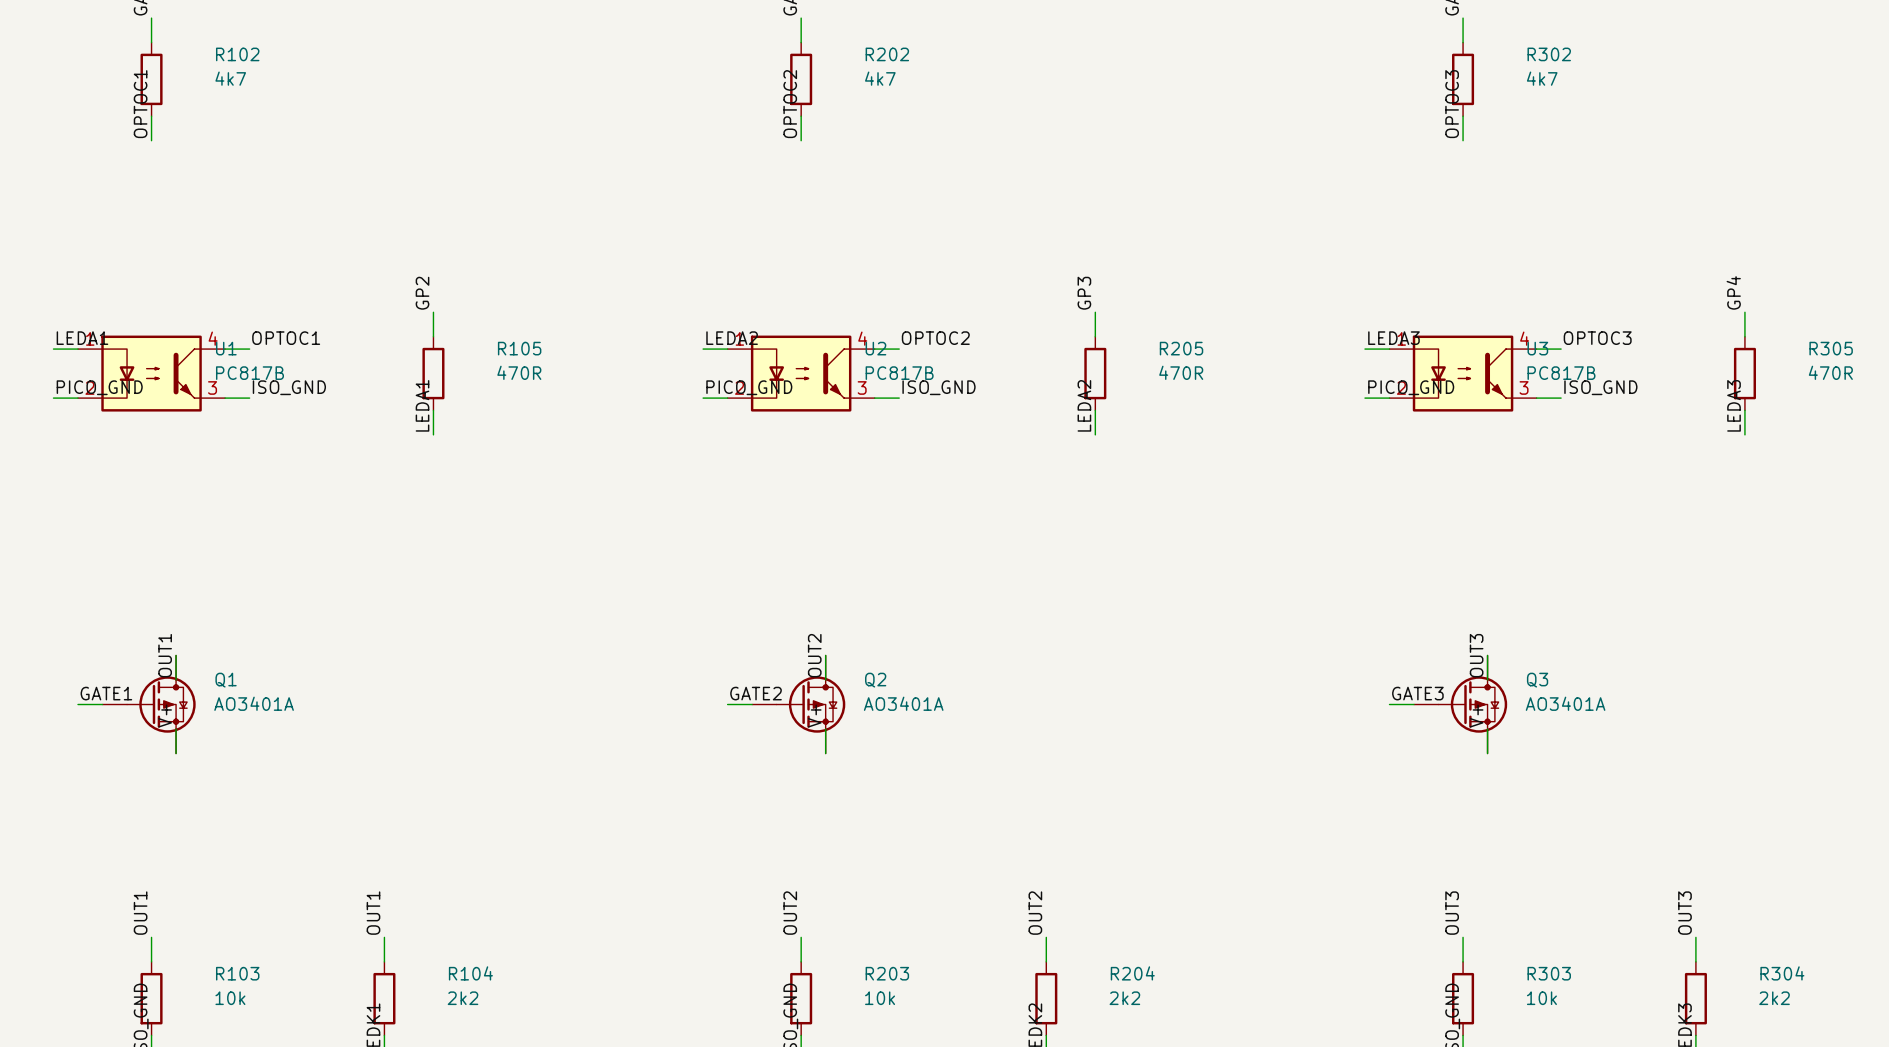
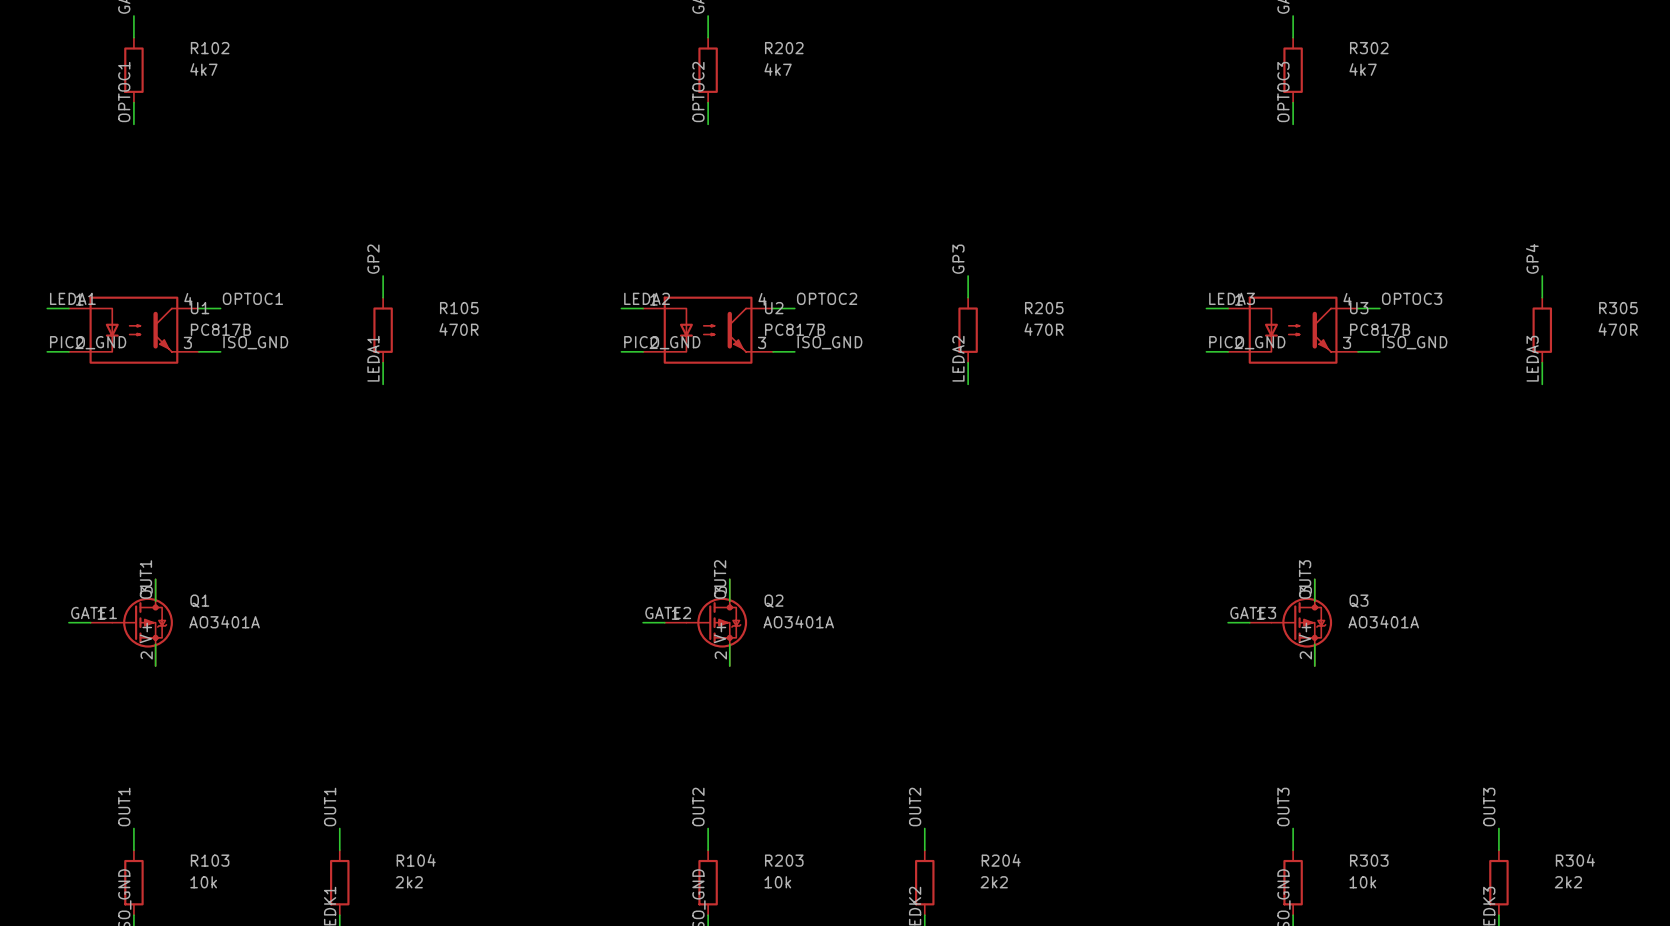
Q1 symbol: [102, 655, 196, 754] -> [90, 579, 173, 667]
Q2 symbol: [752, 655, 846, 754] -> [664, 579, 748, 667]
Q3 symbol: [1414, 655, 1508, 754] -> [1249, 579, 1333, 667]

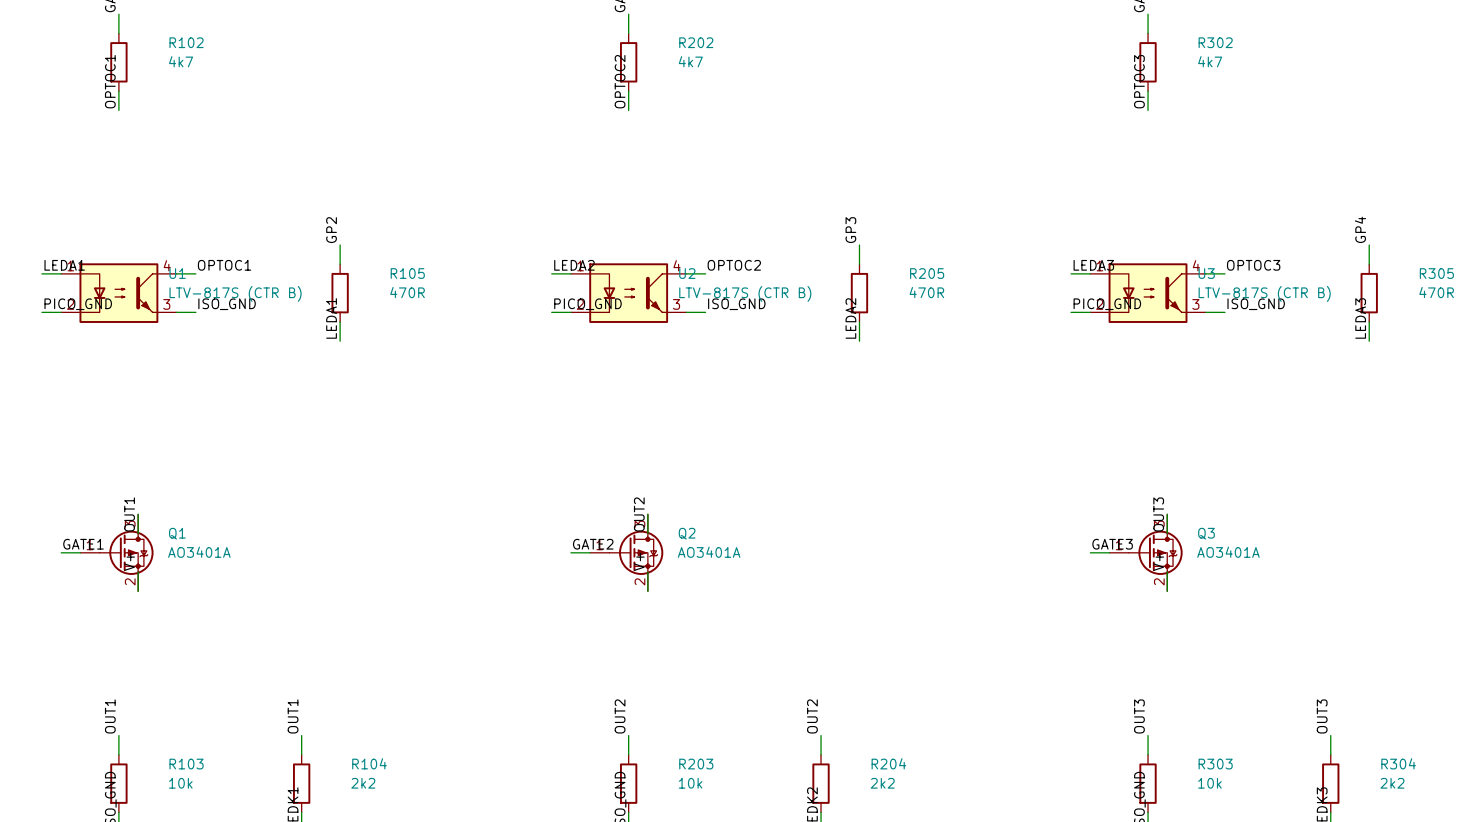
U1 value: PC817B (220, 329) -> LTV-817S (CTR B) (235, 293)
U2 value: PC817B (795, 329) -> LTV-817S (CTR B) (745, 293)
U3 value: PC817B (1380, 329) -> LTV-817S (CTR B) (1264, 293)

